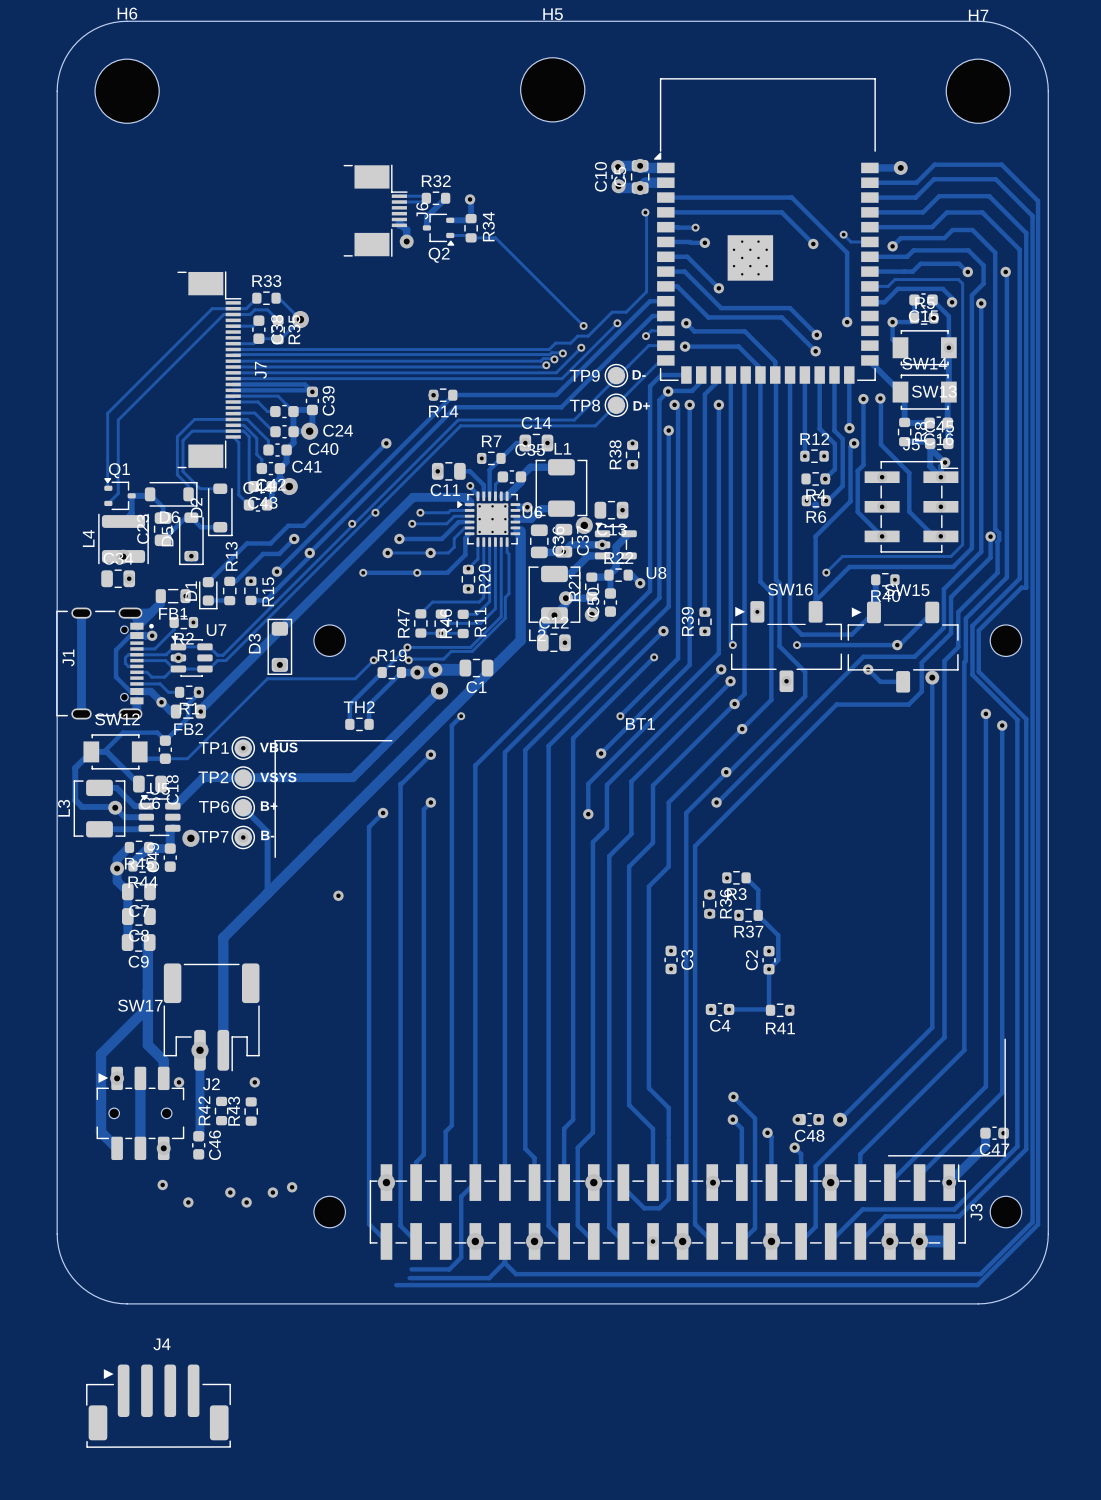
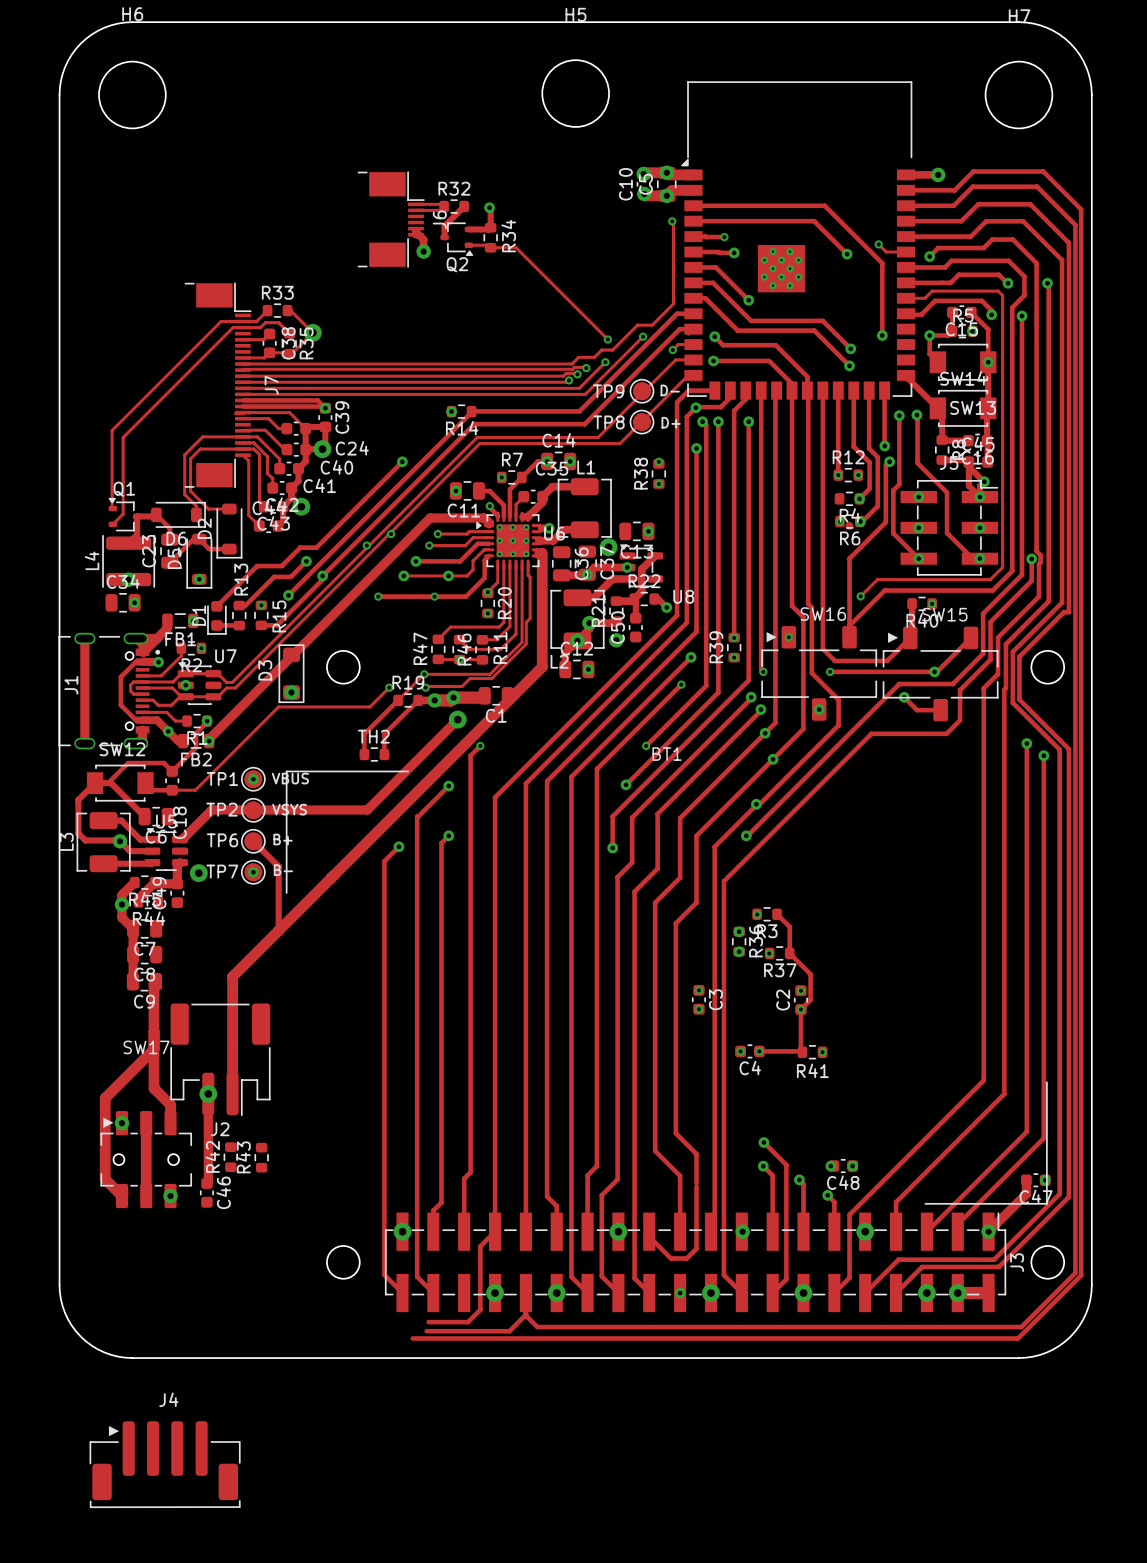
track: (932, 677) (932, 1027) (840, 1119) -> none
via: (932, 677) -> none
via: (338, 895) -> none
via: (179, 1082) -> none
via: (254, 1082) -> none
via: (840, 1119) -> none
via: (162, 1184) -> none
via: (292, 1187) -> none
via: (230, 1192) -> none
via: (272, 1192) -> none
via: (188, 1202) -> none
via: (246, 1202) -> none

